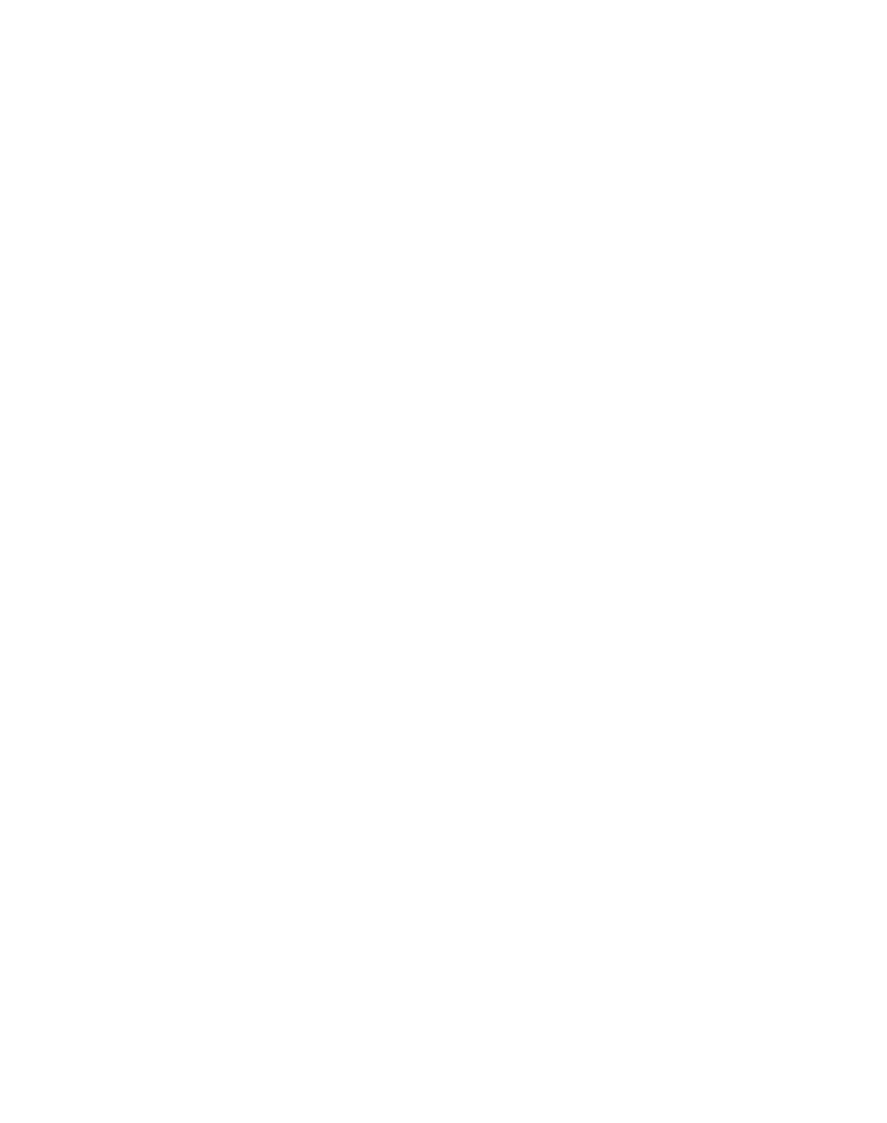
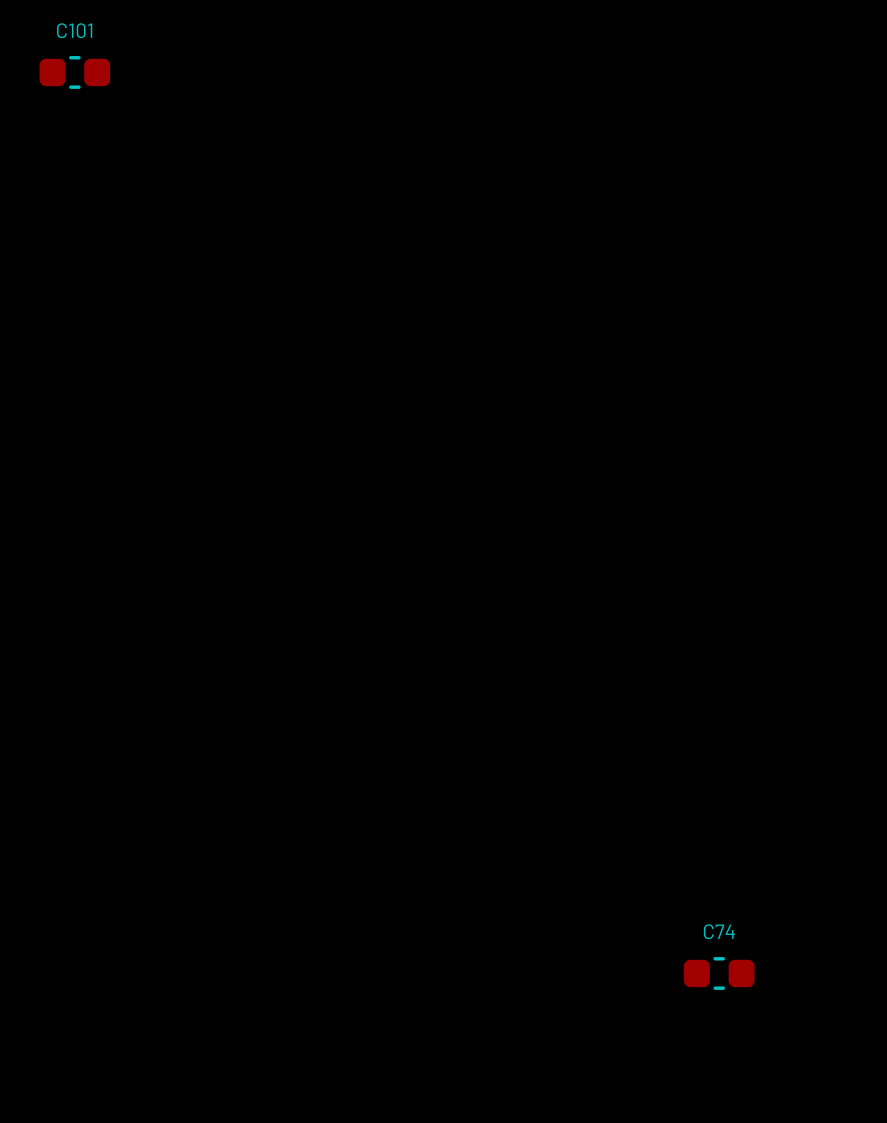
C101: none -> (74, 72)
C74: none -> (719, 973)

